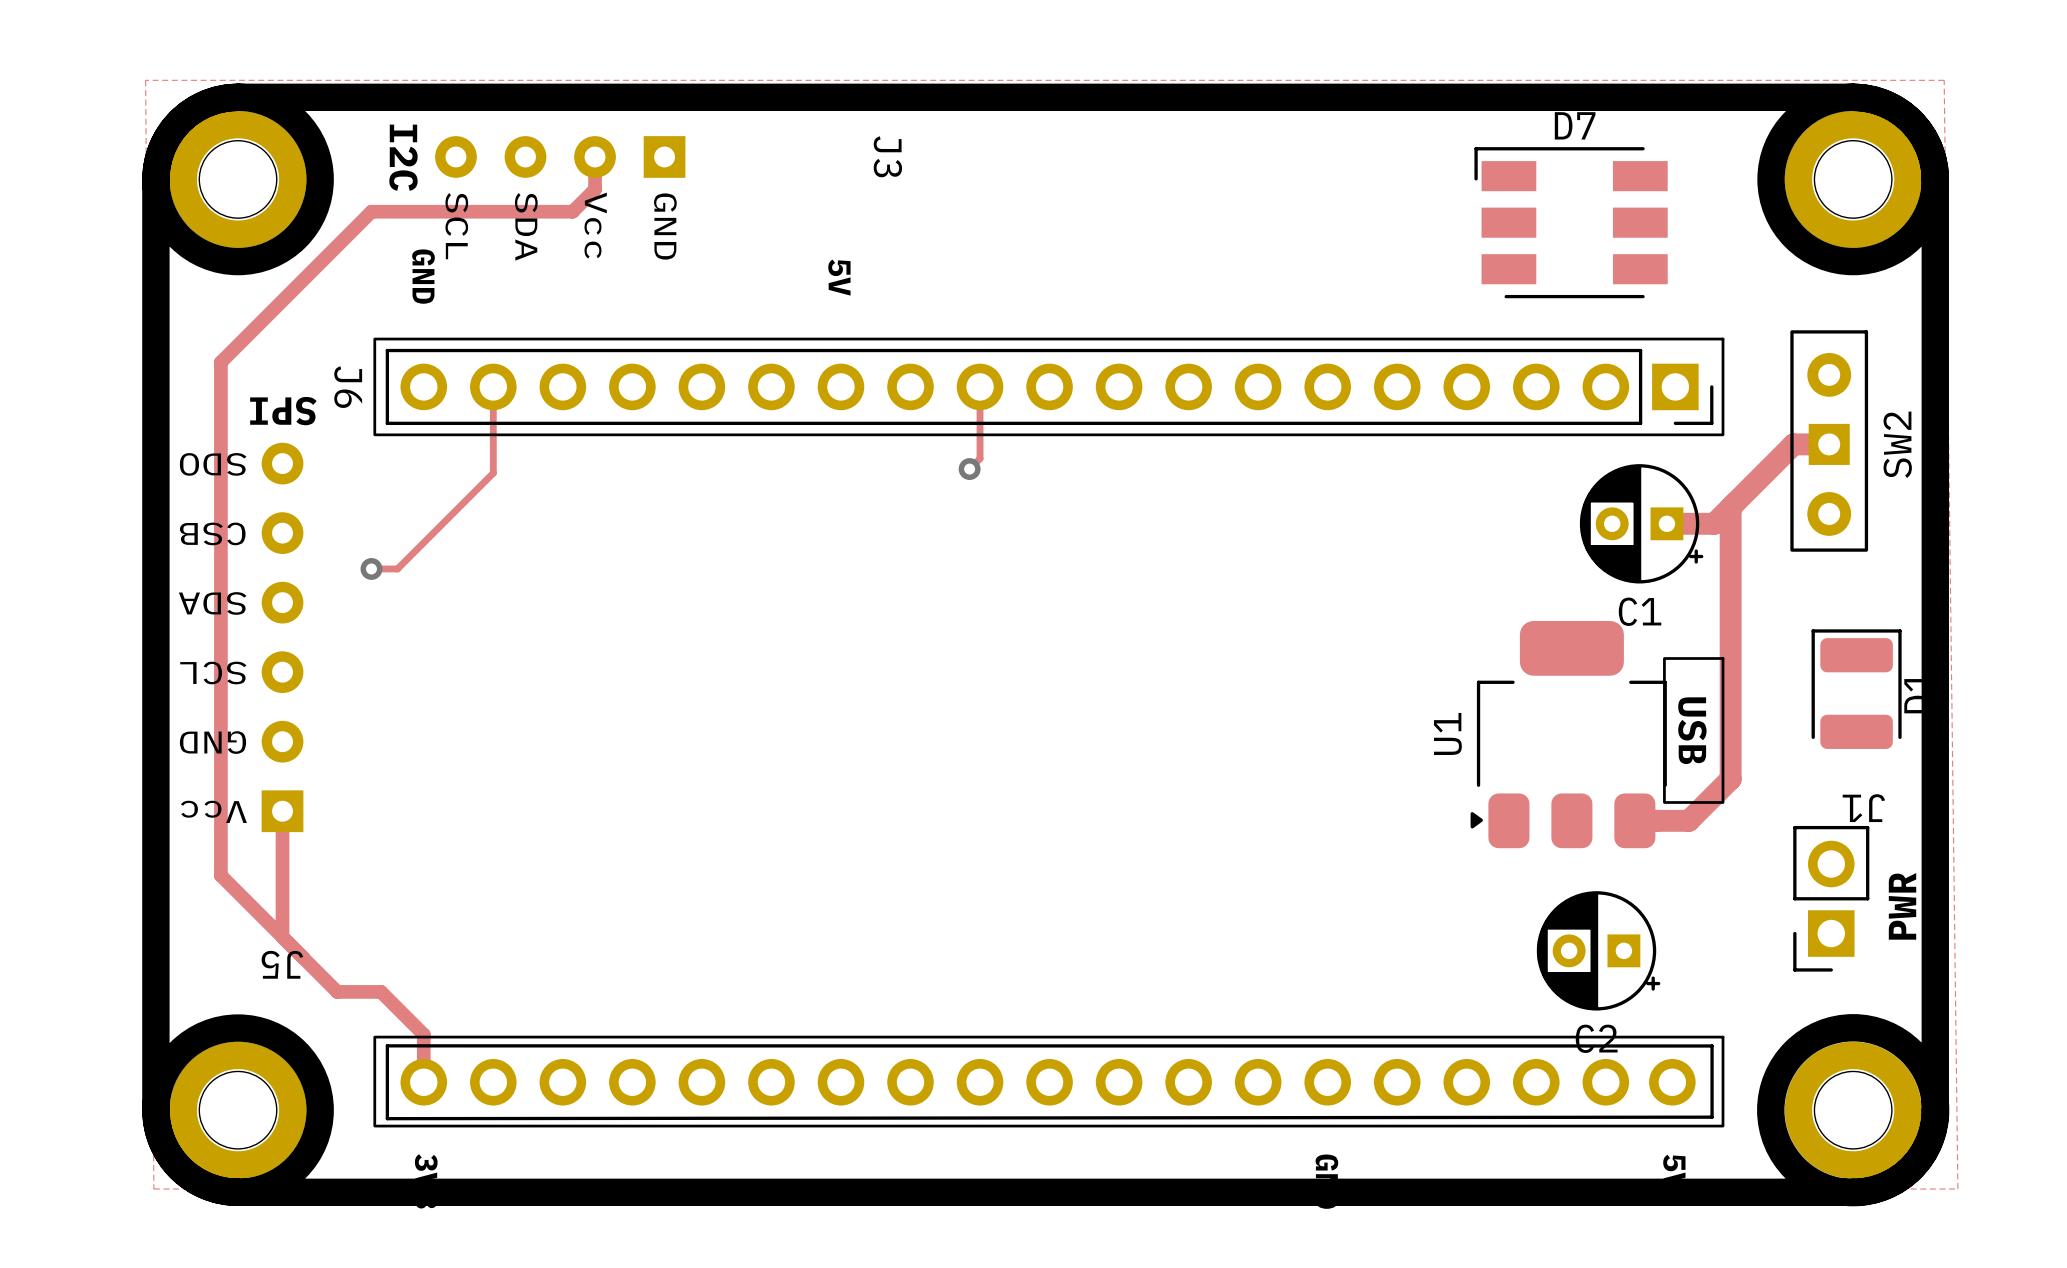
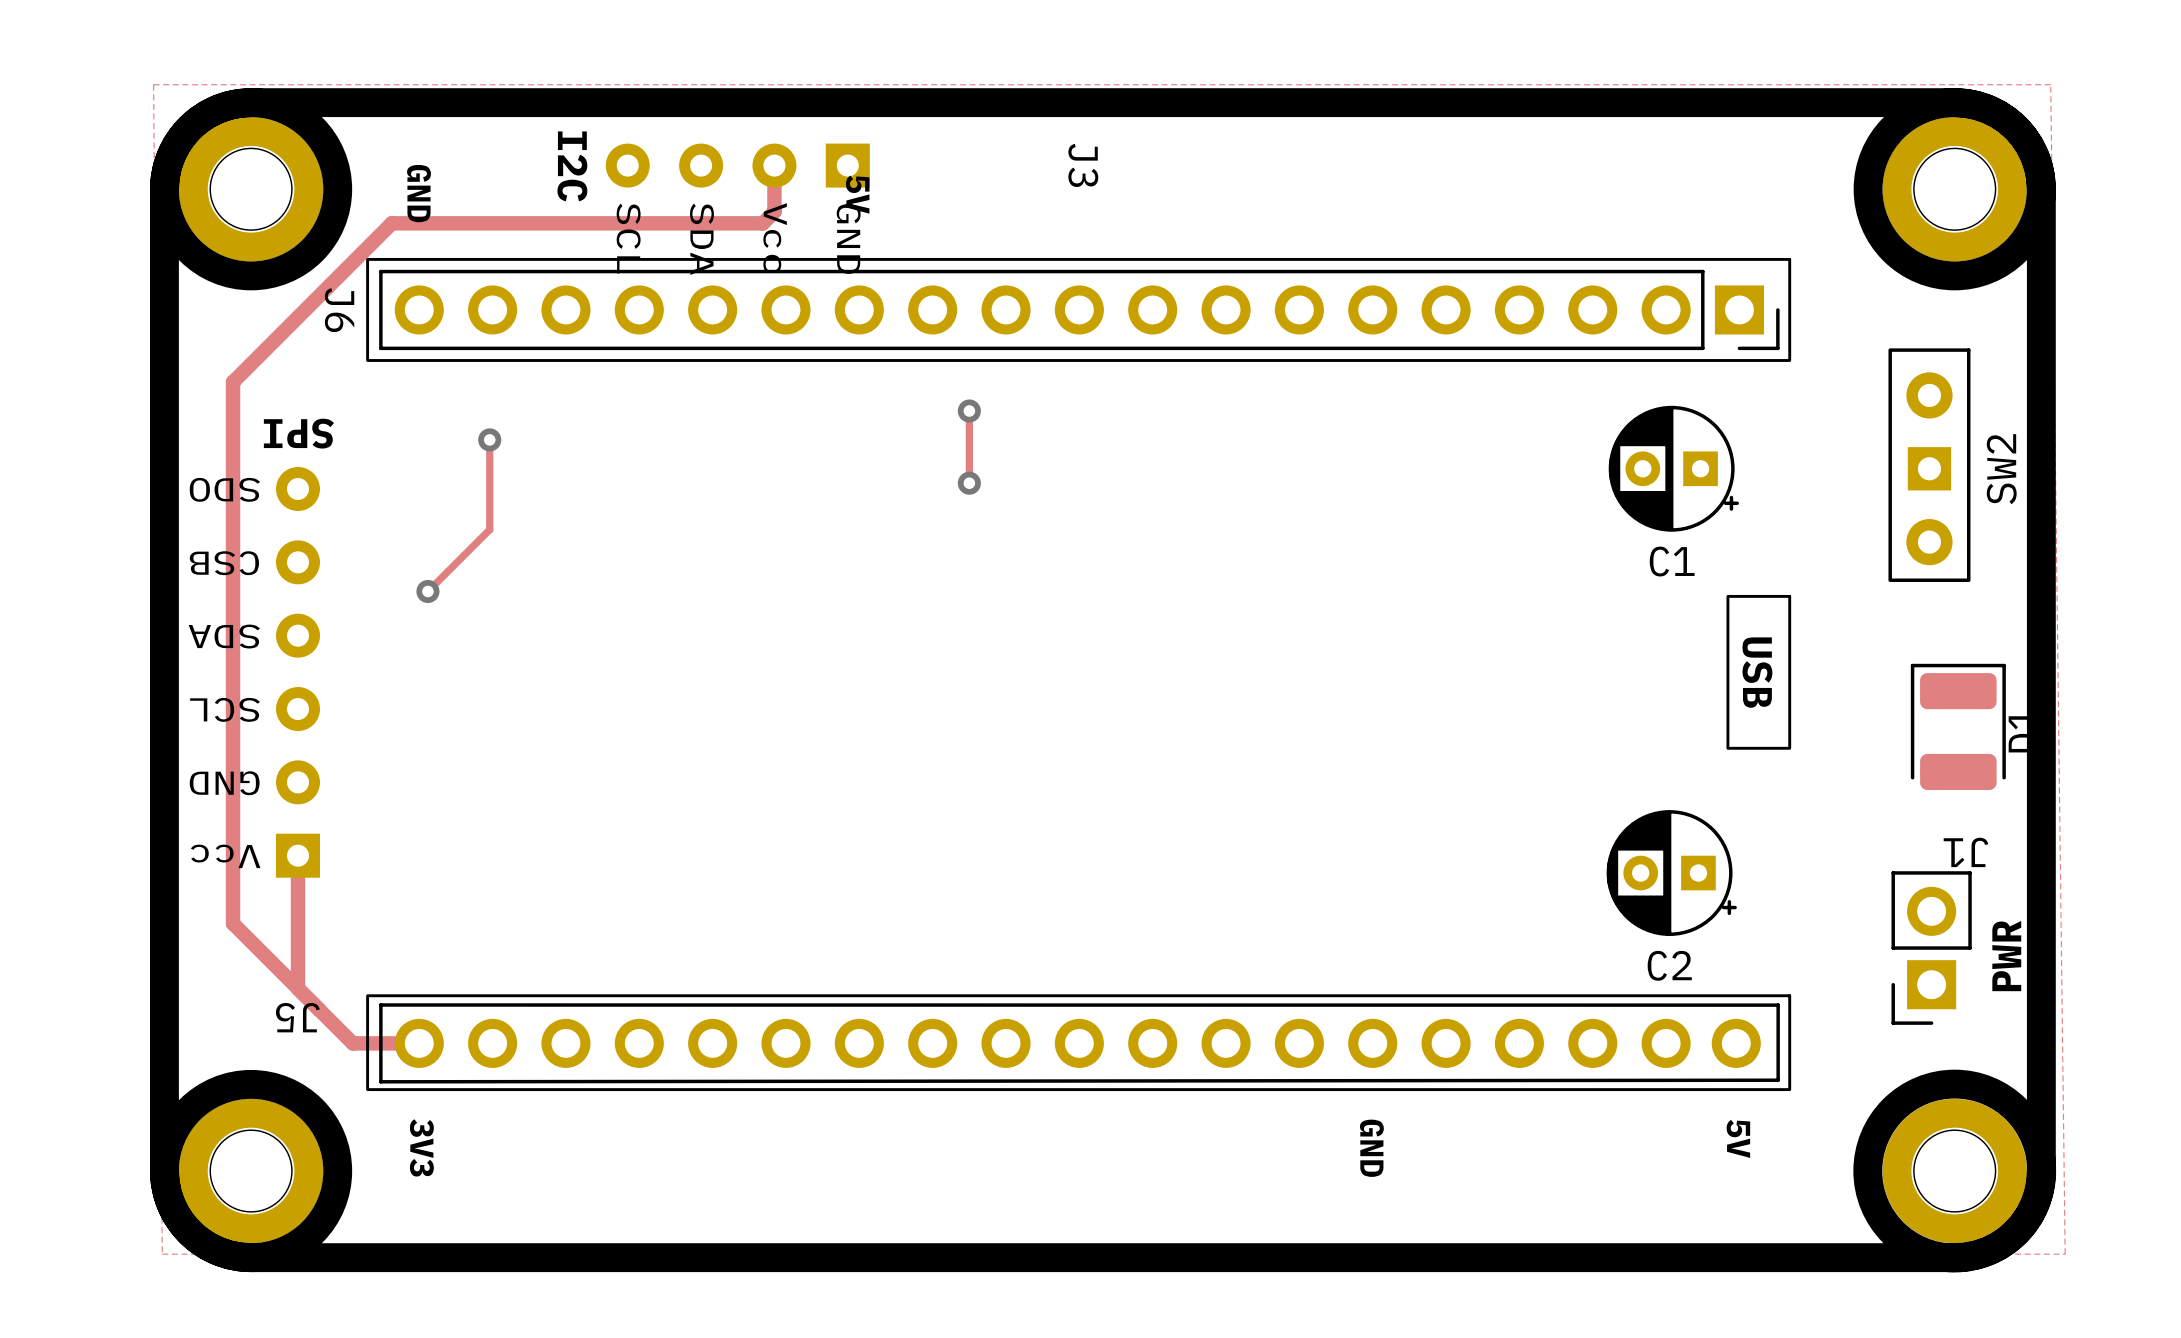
J3 position: (560, 156) -> (737, 165)
track: (595, 156) (595, 189) (572, 211) -> (774, 165) (774, 211) (762, 223) (604, 223)
D7: (1571, 222) -> none
track: (493, 386) (493, 473) (464, 502) -> (489, 439) (489, 529)
track: (980, 386) (980, 458) (969, 469) -> none
track: none -> (969, 411) (969, 483)
via: none -> (969, 411)
via: none -> (489, 439)
track: (1829, 444) (1793, 444) (1714, 523) (1666, 523) -> none
via: none -> (969, 483)
via: (969, 469) -> none
track: (1730, 507) (1730, 779) (1688, 820) (1634, 820) -> none
C1 position: (1641, 523) -> (1673, 468)
track: (405, 560) (397, 568) (371, 568) -> none
via position: (371, 568) -> (427, 591)
J6 position: (1048, 732) -> (1078, 674)
U1: (1568, 734) -> none
C2 position: (1598, 950) -> (1671, 873)
track: (334, 989) (337, 991) (381, 991) (423, 1034) (423, 1082) -> (352, 1043) (416, 1043)

